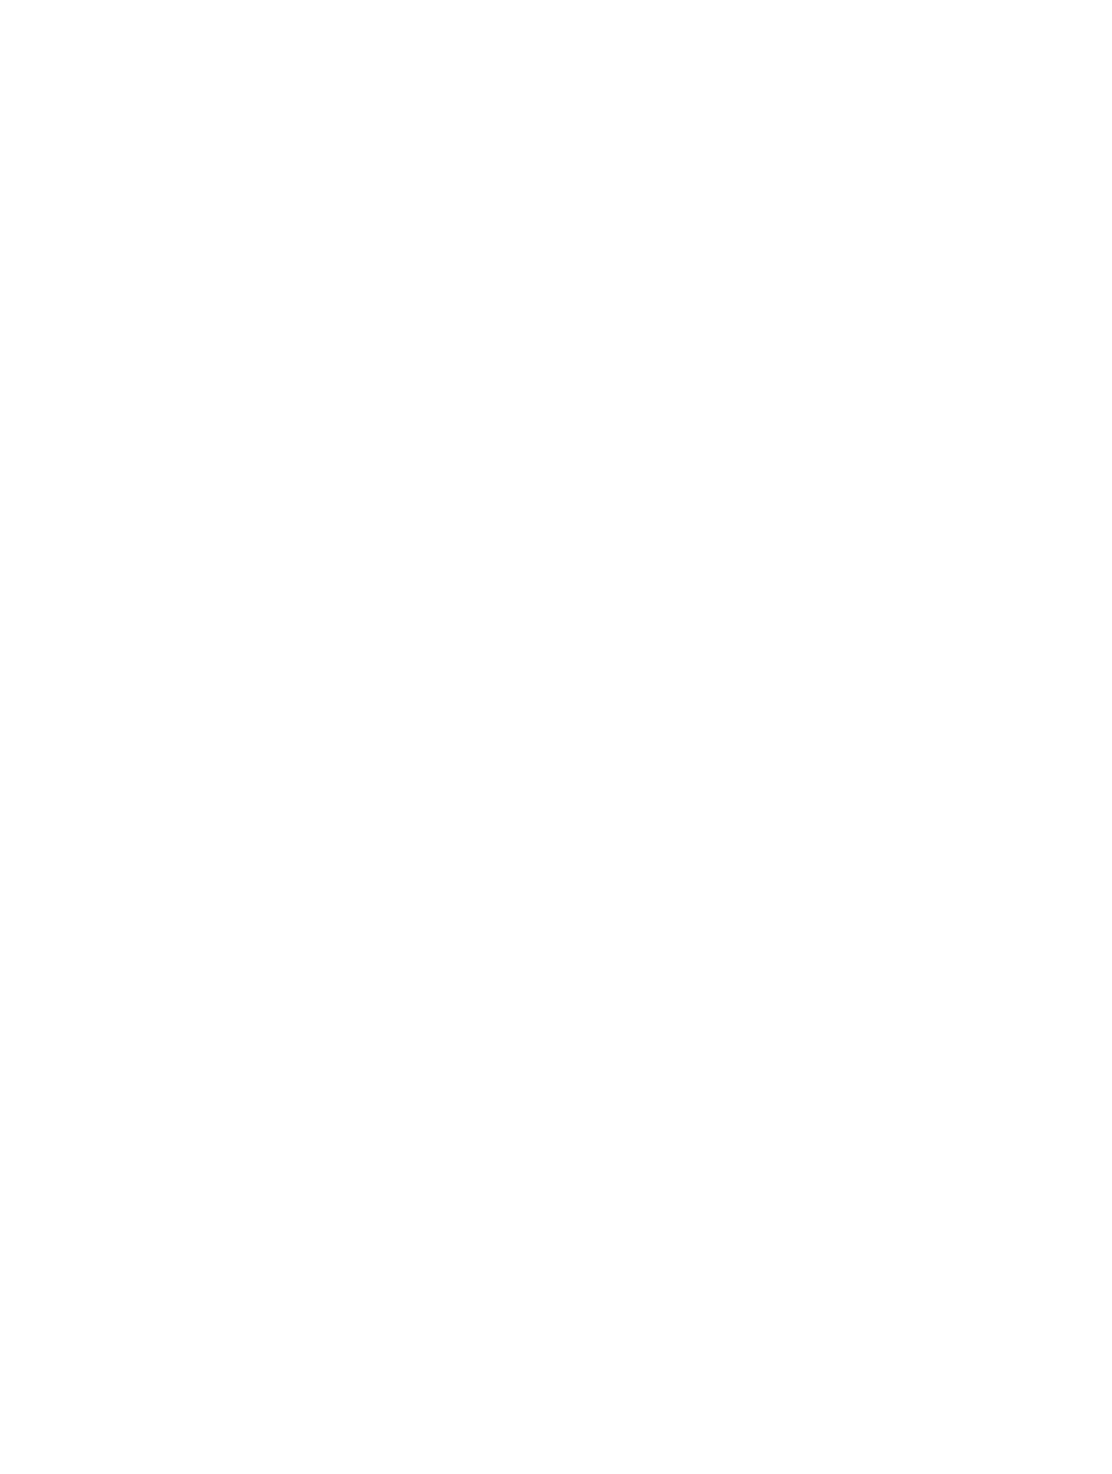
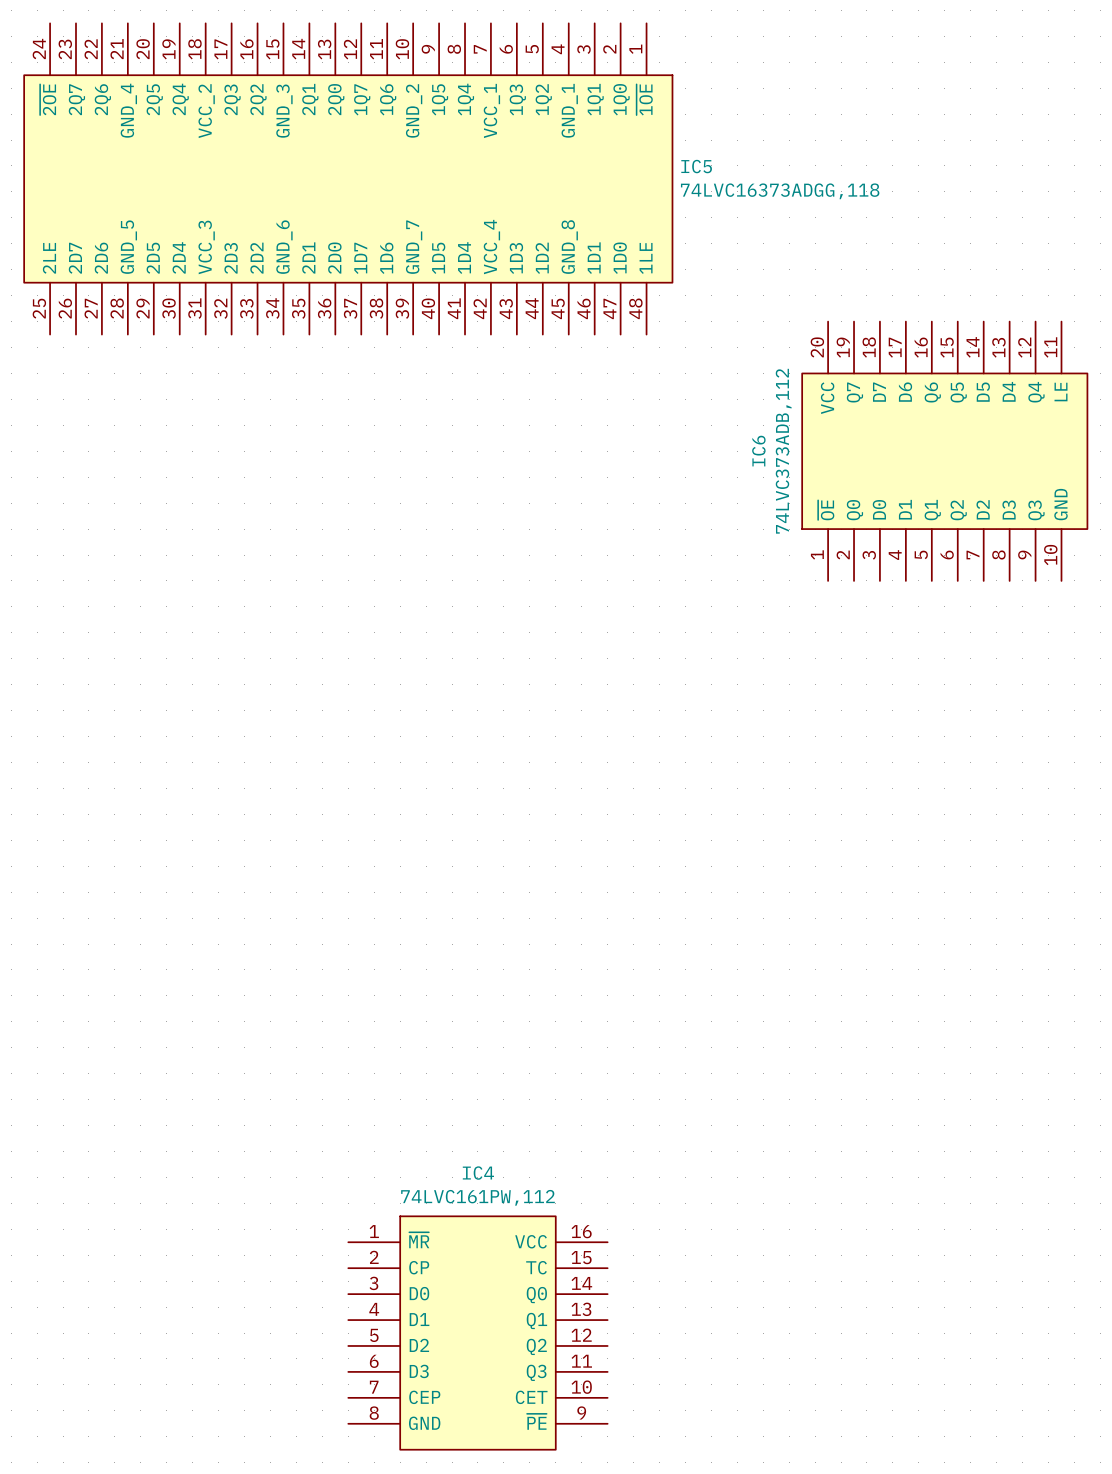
IC5: none -> 74LVC16373ADGG,118 (348, 178)
IC6: none -> 74LVC373ADB,112 (944, 451)
IC4: none -> 74LVC161PW,112 (477, 1333)

